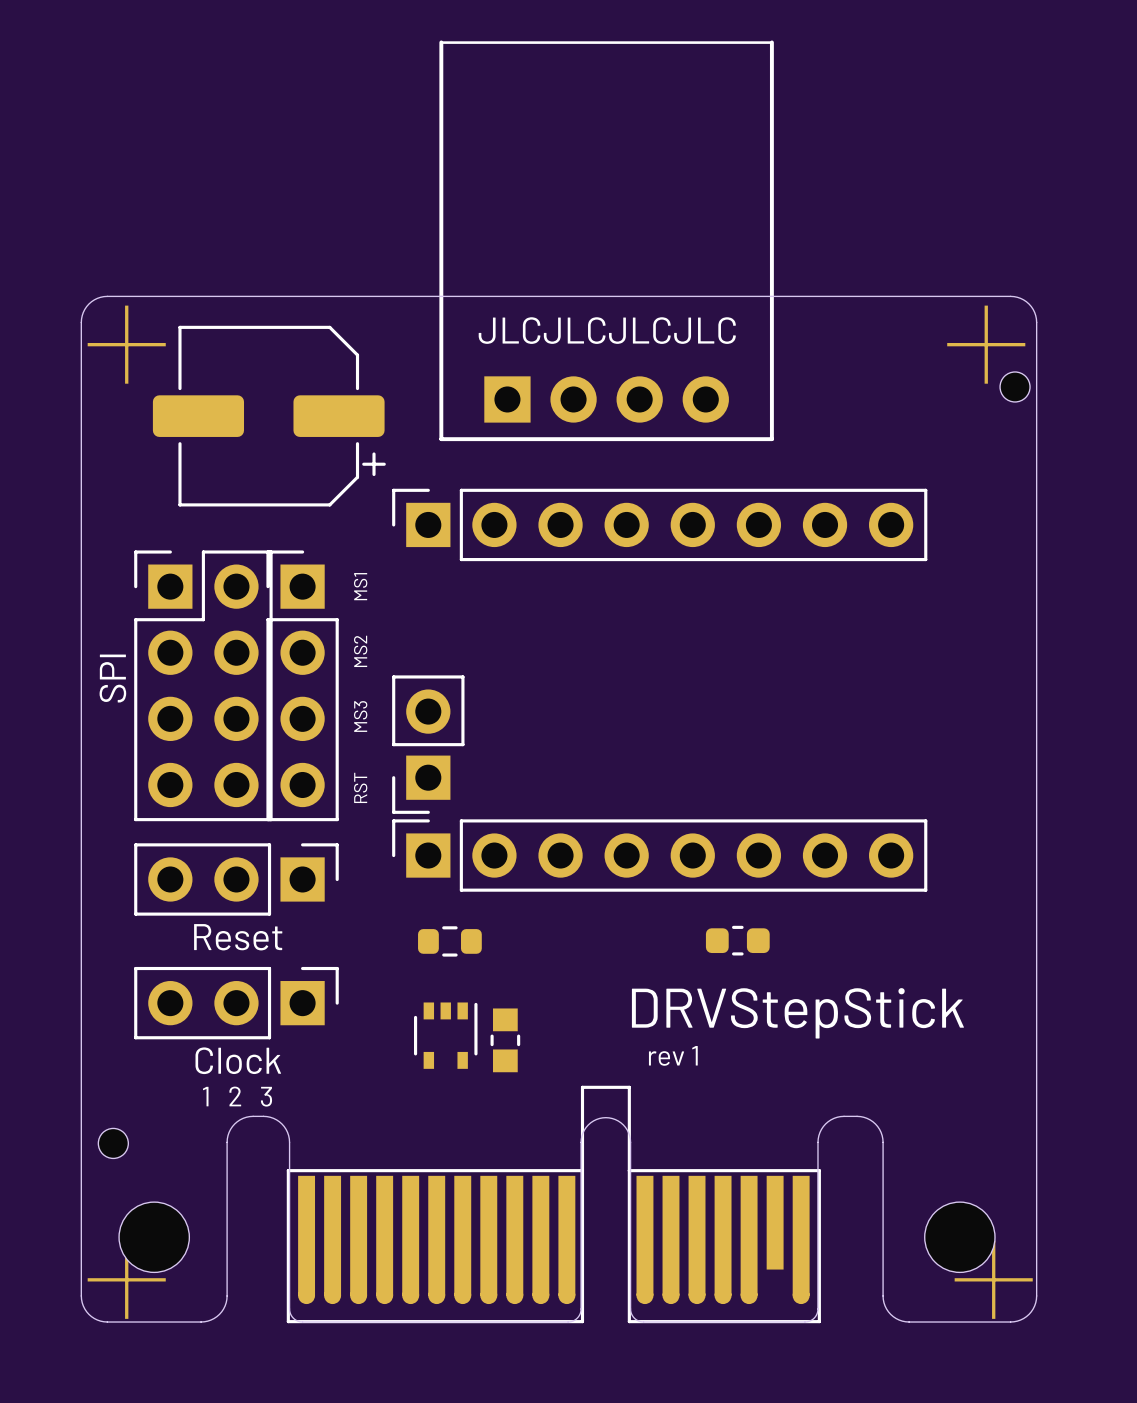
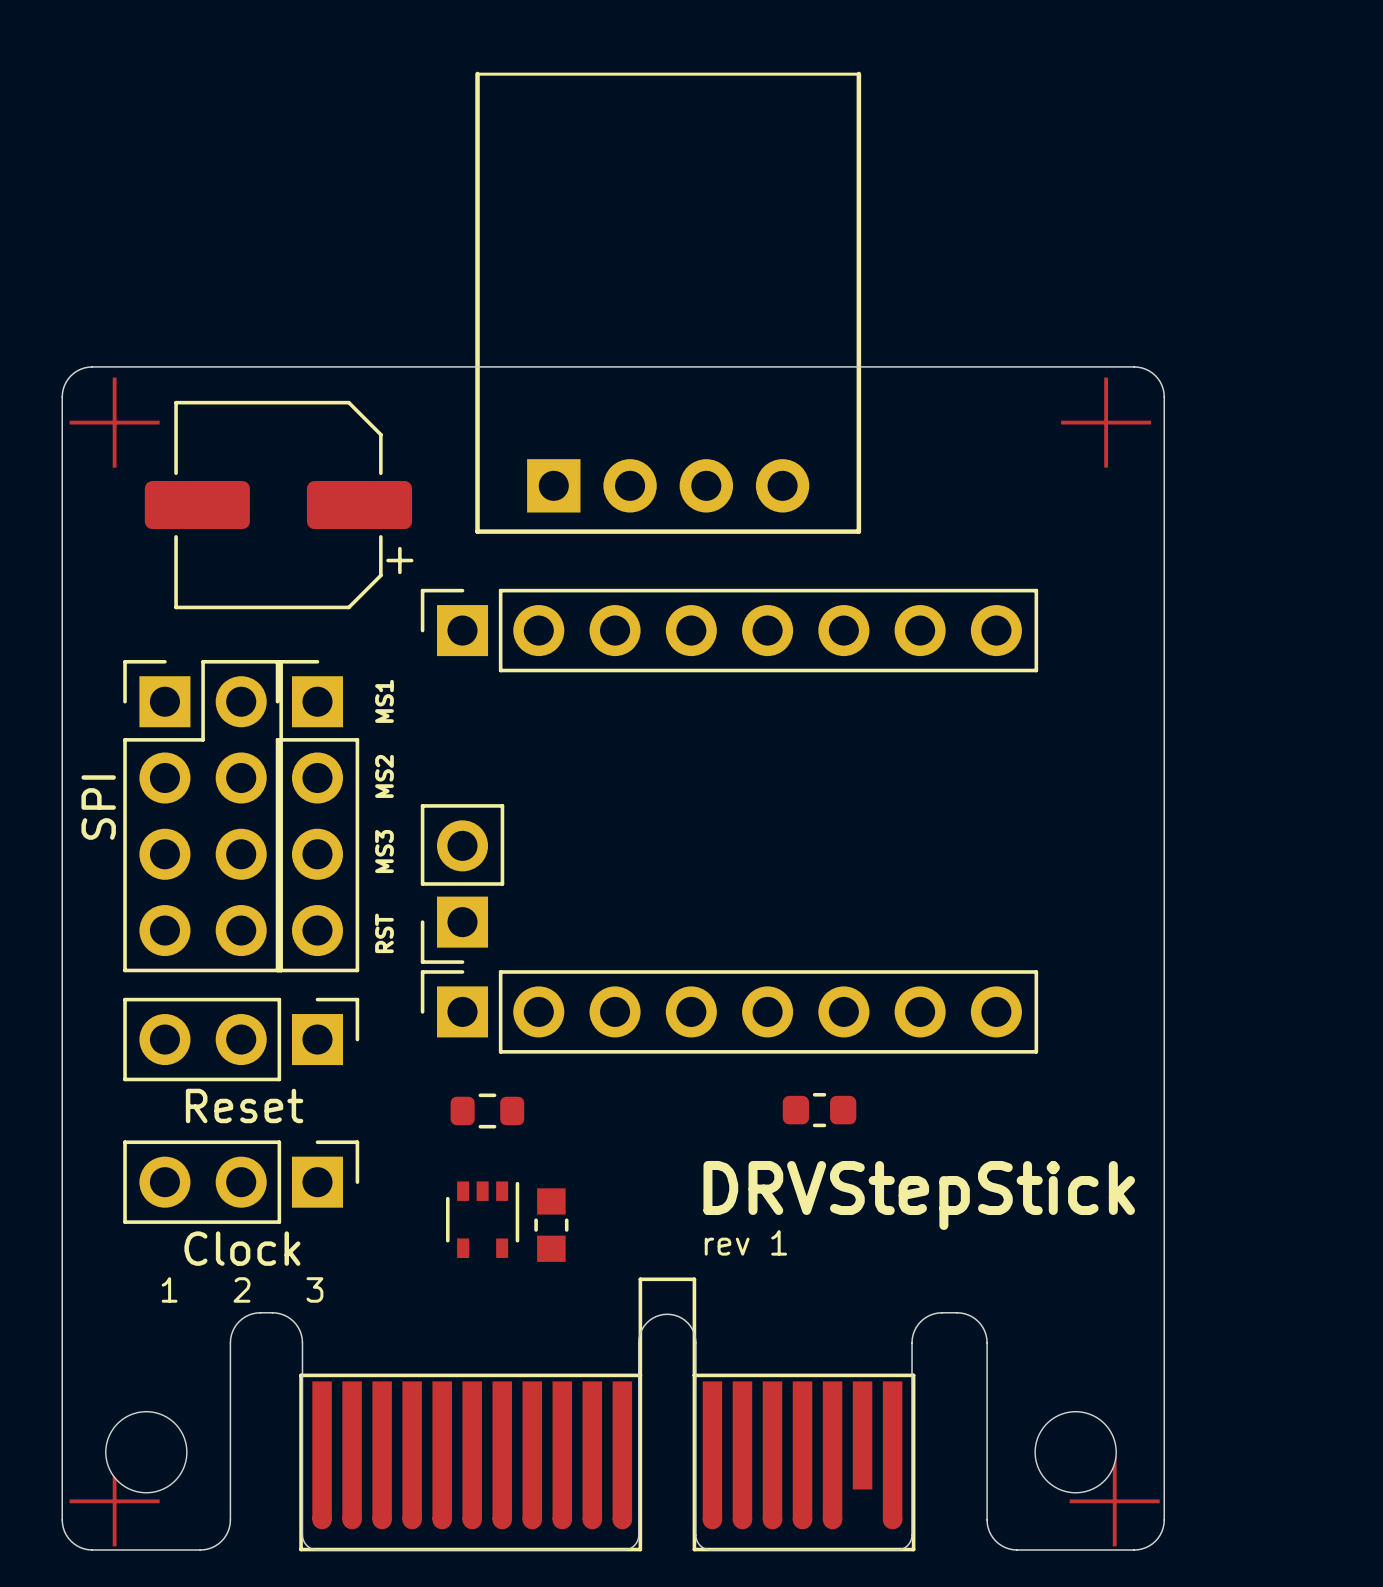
text: JLCJLCJLCJLC (607, 330) -> none
part: (1015, 386) -> none
part: (113, 1143) -> none

